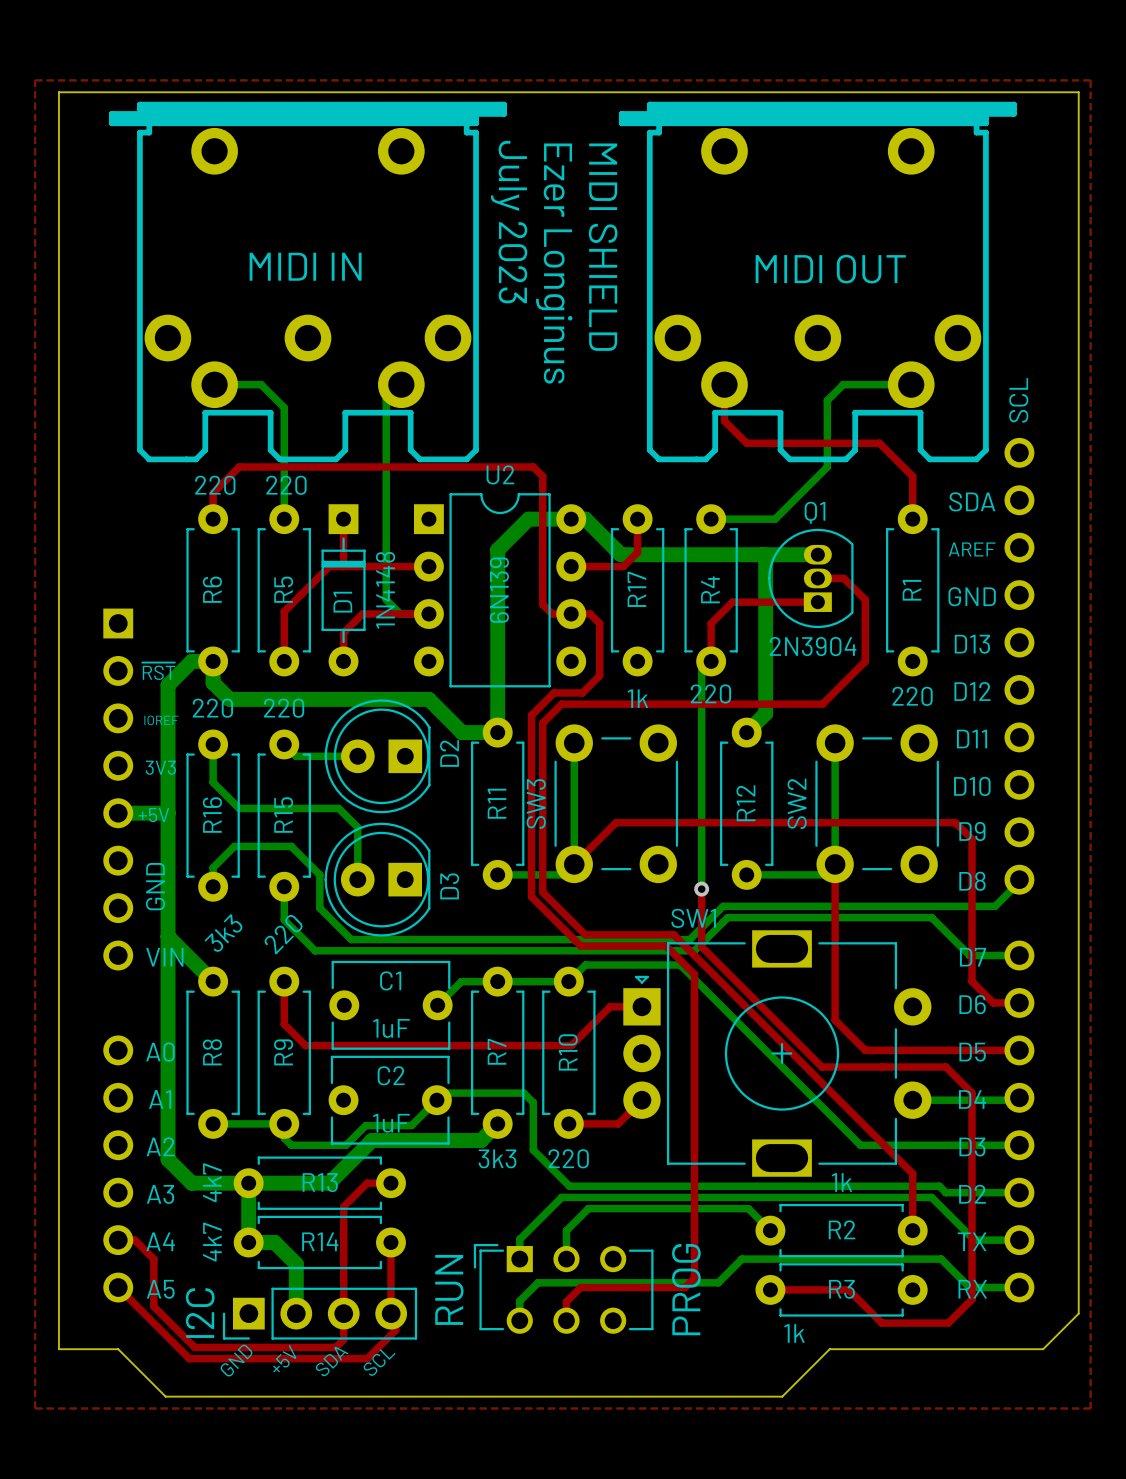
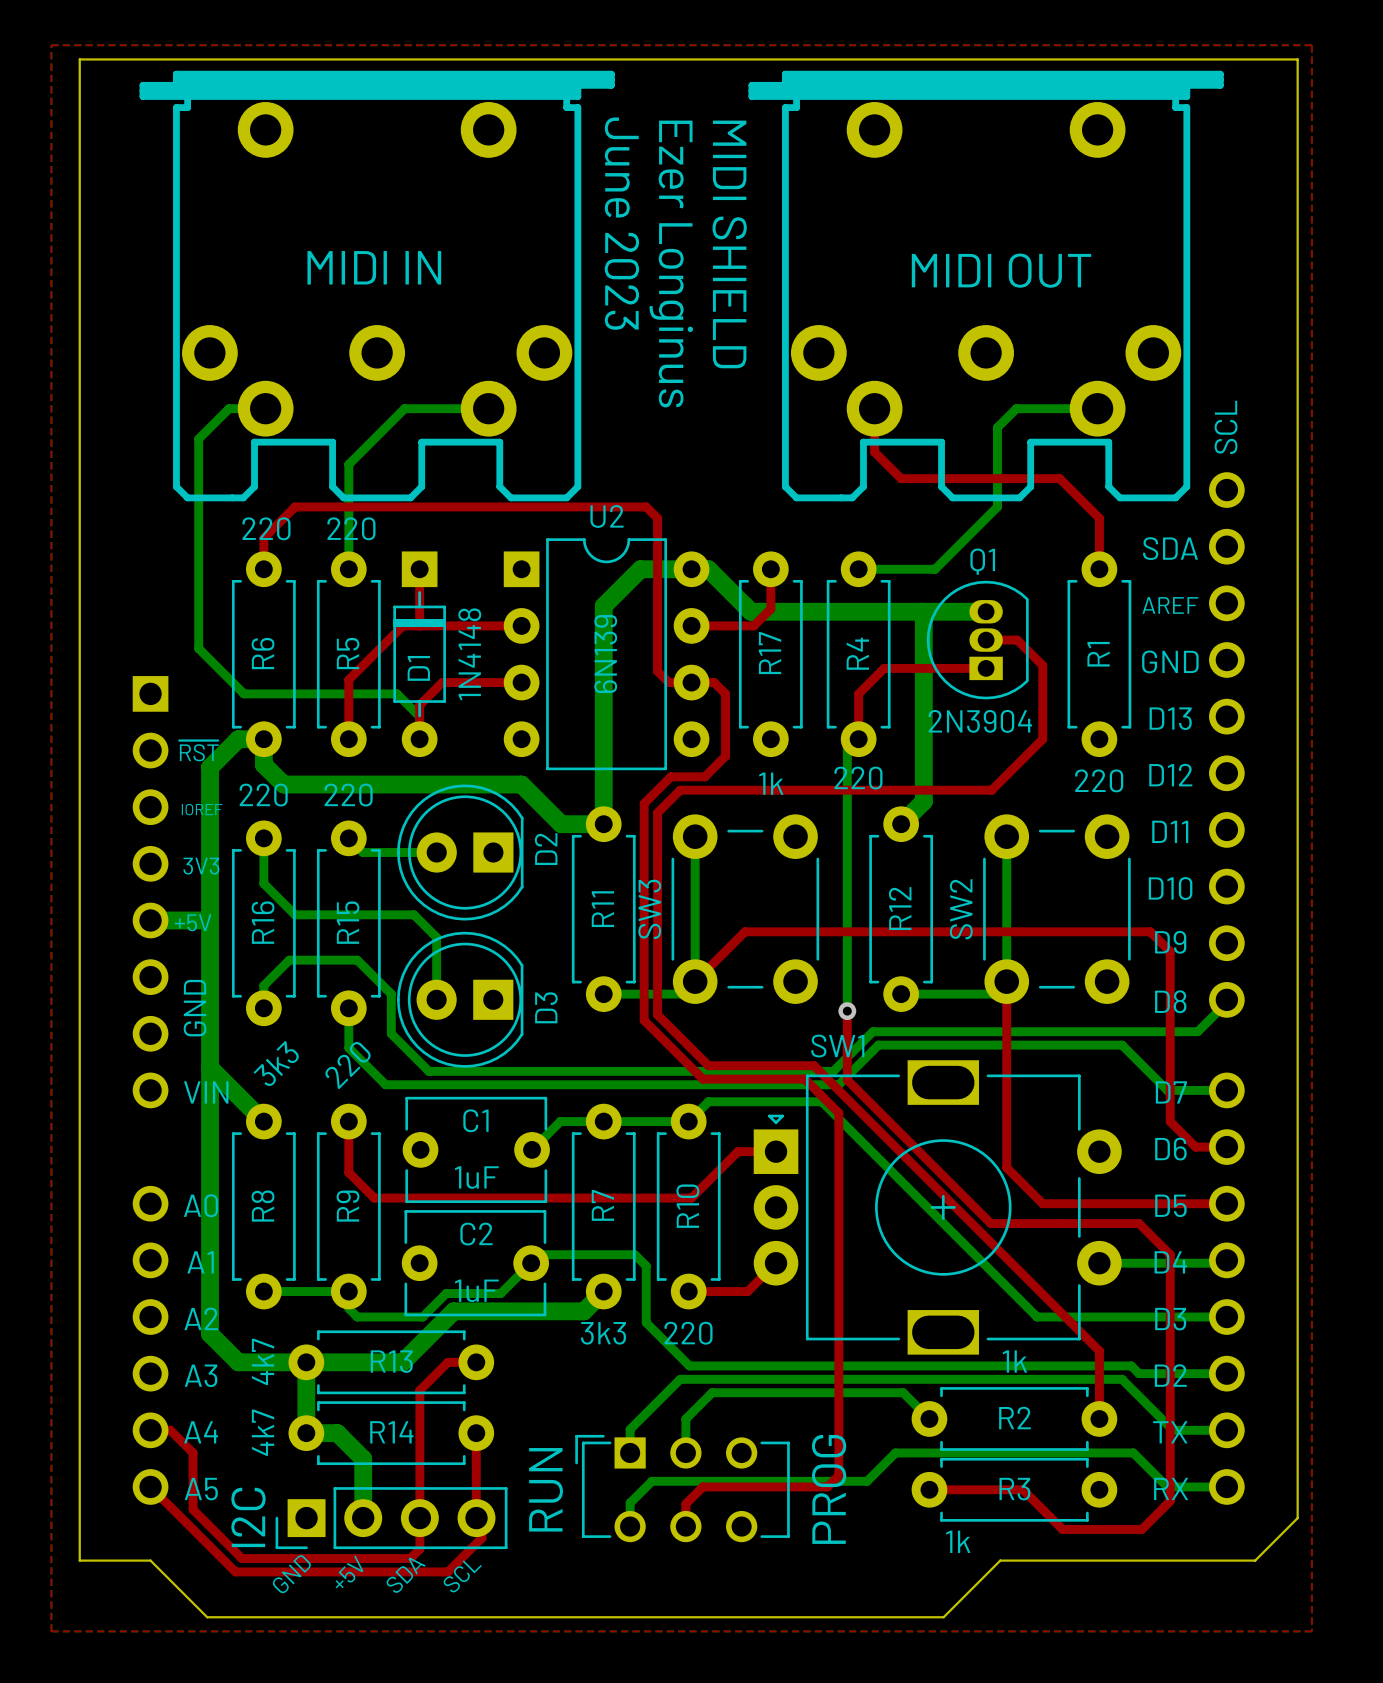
text: July 2023 (509, 222) -> June 2023 (621, 223)
bottom track: (214, 384) (261, 384) (284, 407) (284, 431) -> (488, 408) (404, 408) (348, 464)
bottom track: none -> (265, 408) (229, 408) (198, 438) (198, 648) (244, 693) (396, 693) (419, 716) (419, 739)
bottom track: (401, 384) (386, 399) (386, 599) (400, 614) (428, 614) -> none

